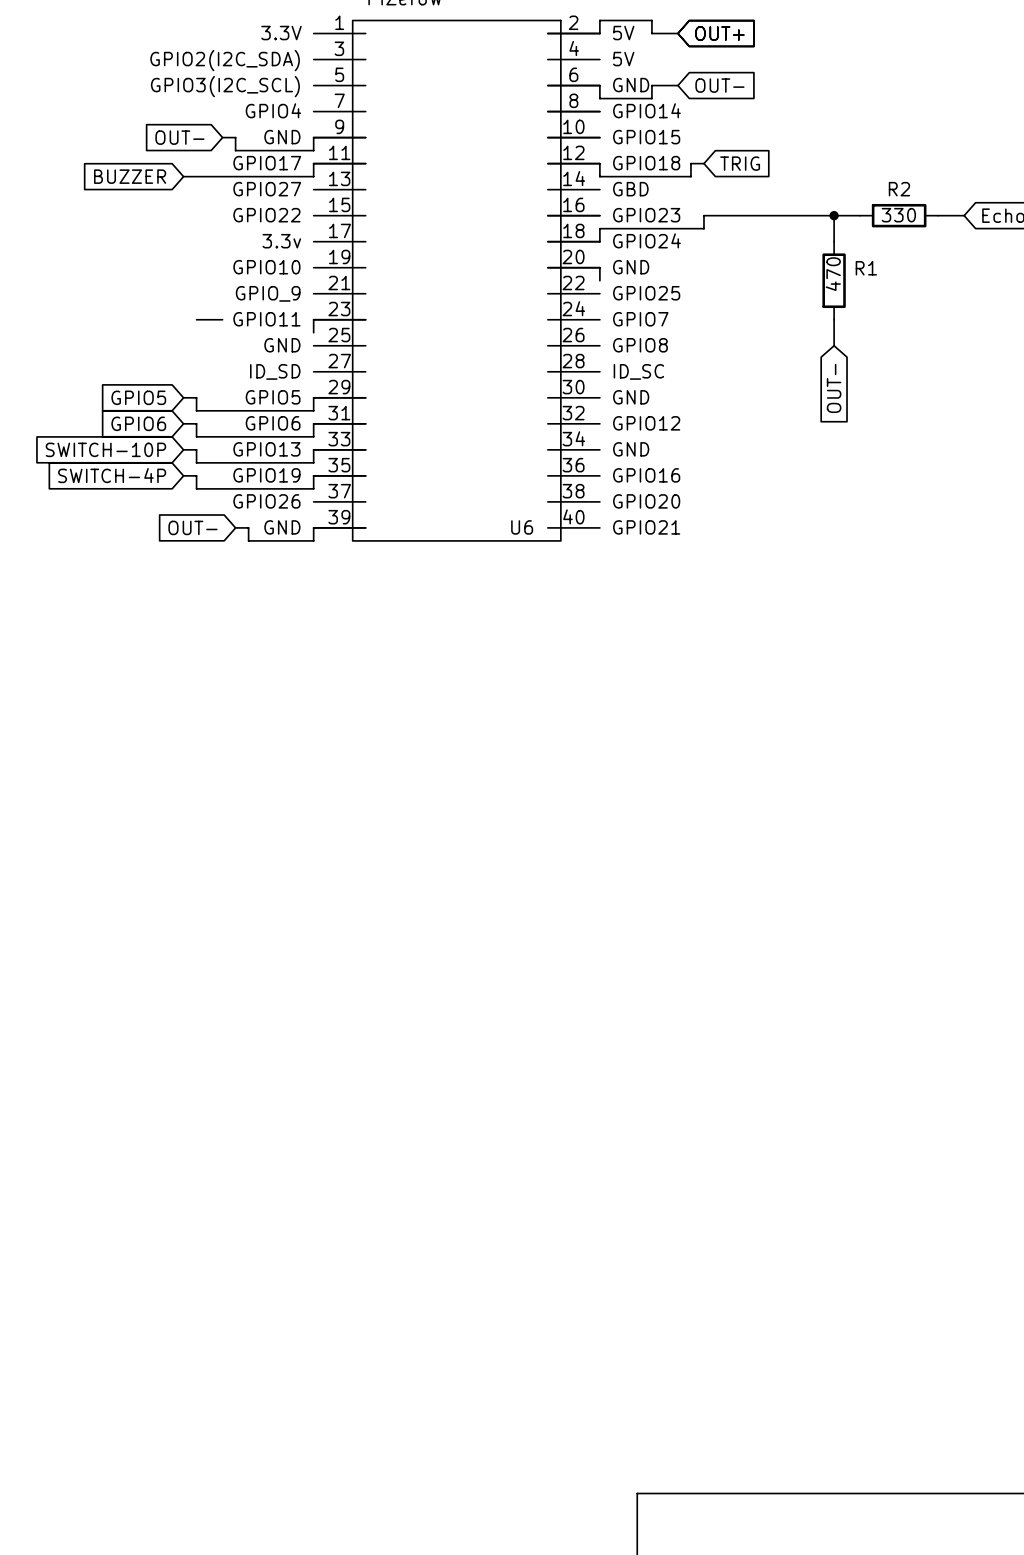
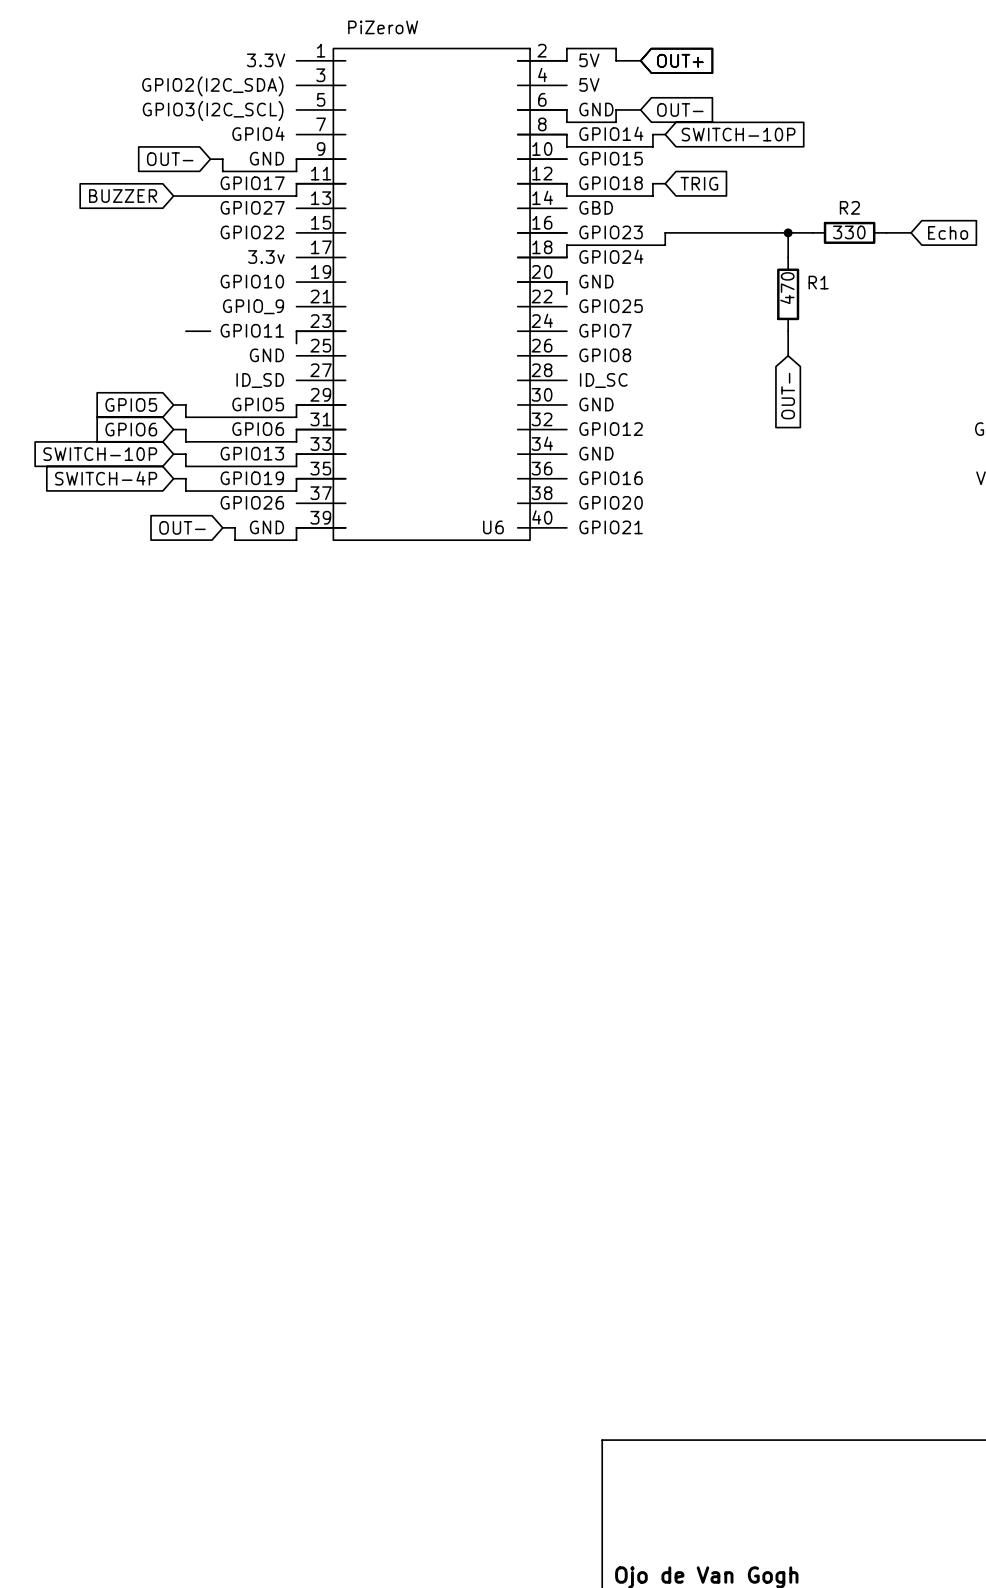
wire: none -> (566, 134) (566, 146) (652, 146) (652, 134) (665, 134)
global label: none -> SWITCH-10P (738, 134)

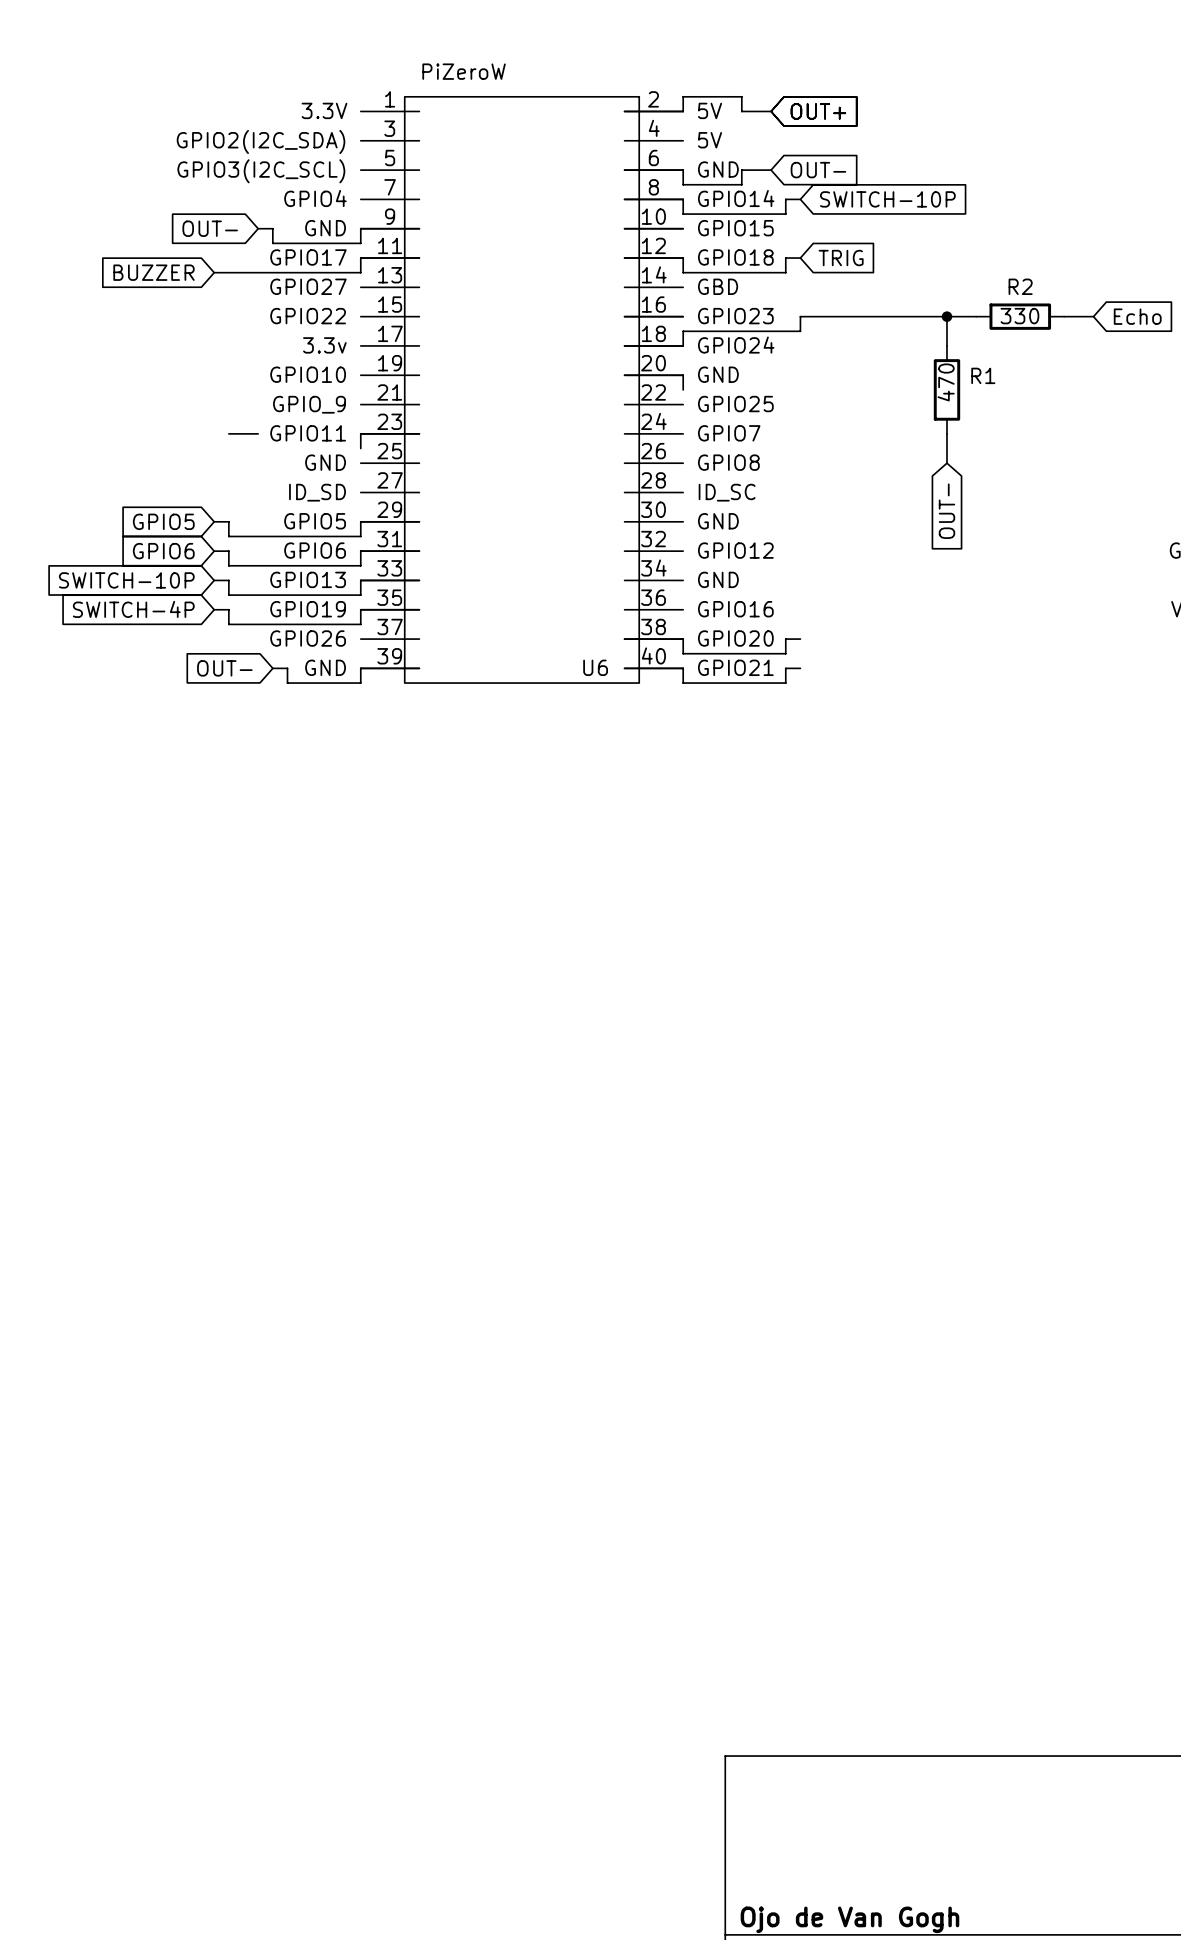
wire: none -> (624, 639) (683, 639) (683, 653) (785, 653) (785, 639) (800, 639)
wire: none -> (624, 668) (683, 668) (683, 683) (785, 683) (785, 668) (800, 668)

